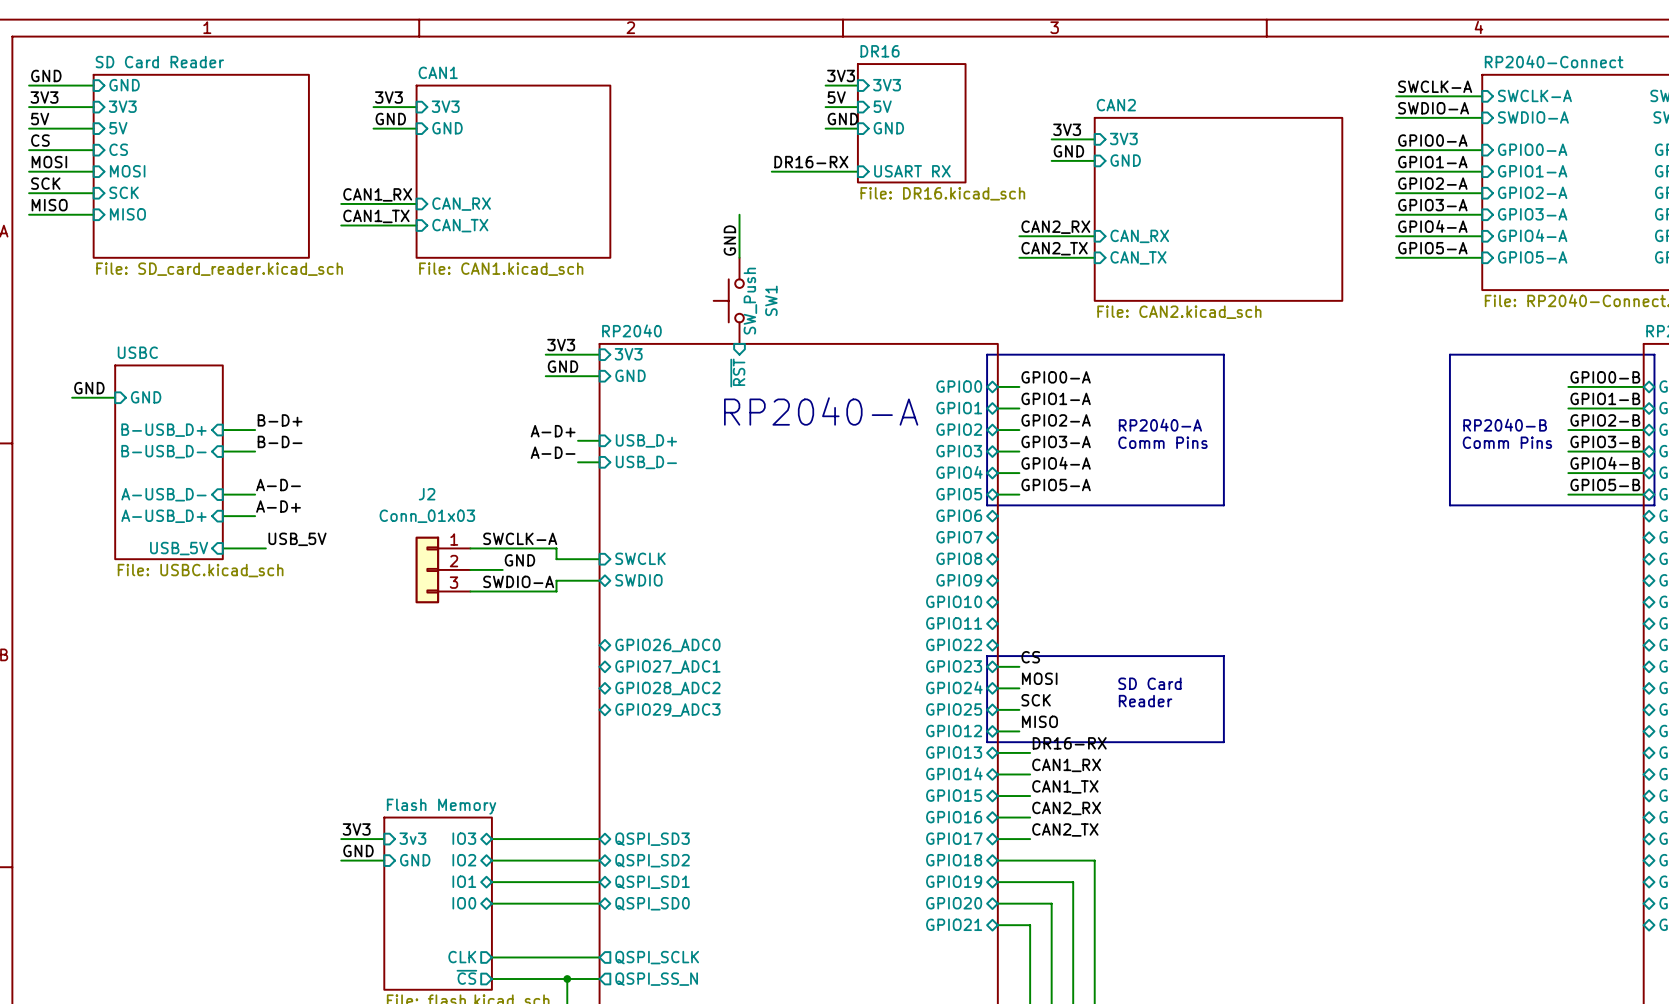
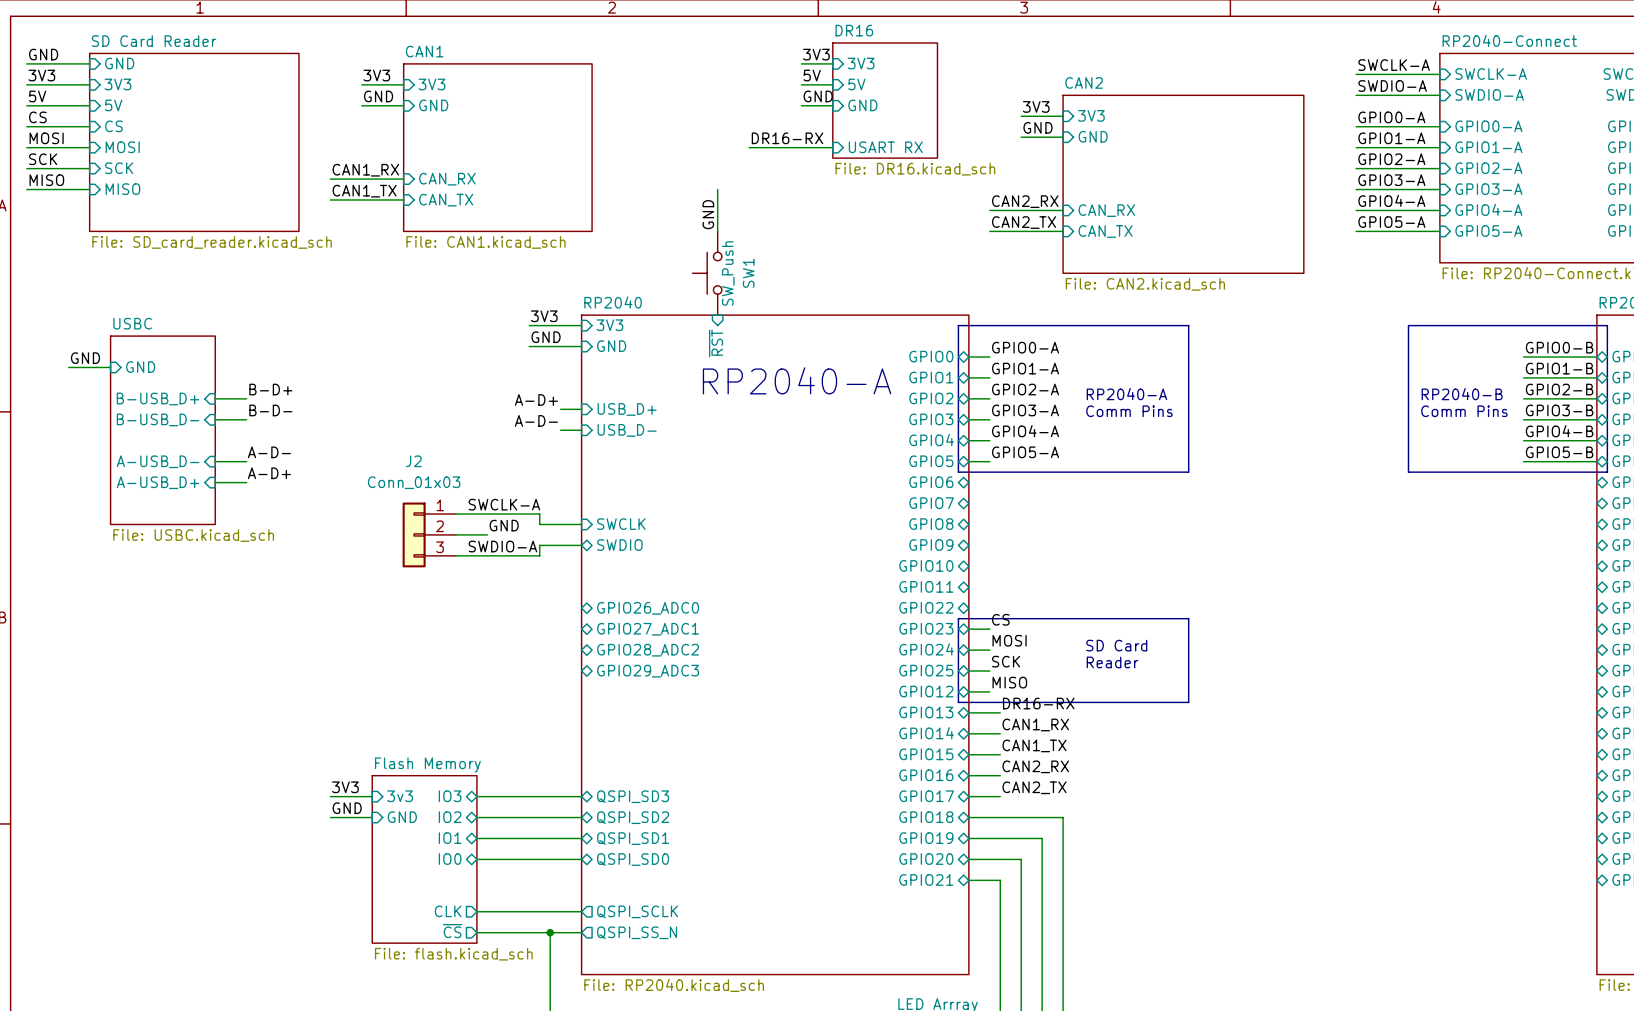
label: USB_5V (297, 539) -> none
sheet pin: USB_5V (179, 548) -> none
wire: (222, 548) (265, 548) -> none

